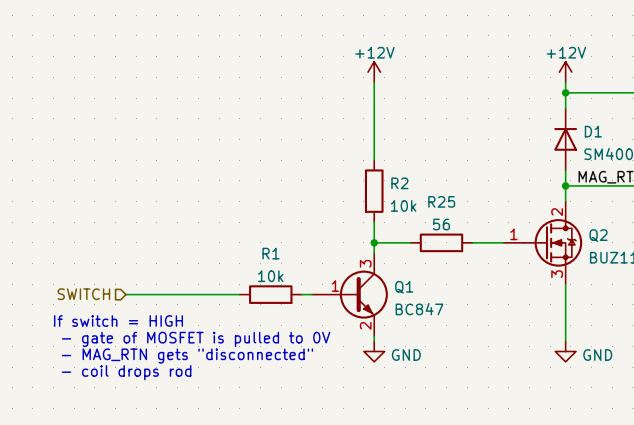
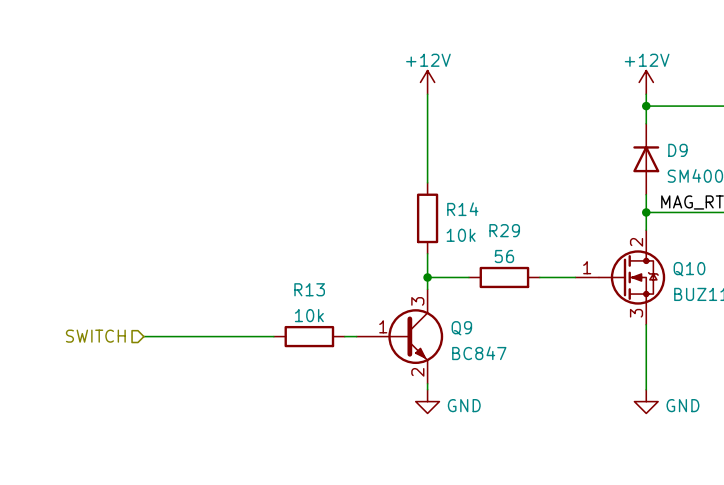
D1 name: D1 (593, 131) -> D9 (677, 150)
R2 name: R2 (399, 183) -> R14 (462, 209)
R25 name: R25 (441, 201) -> R29 (504, 230)
Q2 name: Q2 (598, 235) -> Q10 (689, 269)
R1 name: R1 (271, 253) -> R13 (309, 289)
Q1 name: Q1 (404, 287) -> Q9 (461, 328)
text: If switch = HIGH (118, 320) -> none
text: - gate of MOSFET is pulled to 0V (196, 339) -> none
text: - MAG_RTN gets "disconnected" (187, 356) -> none
text: - coil drops rod (126, 372) -> none

